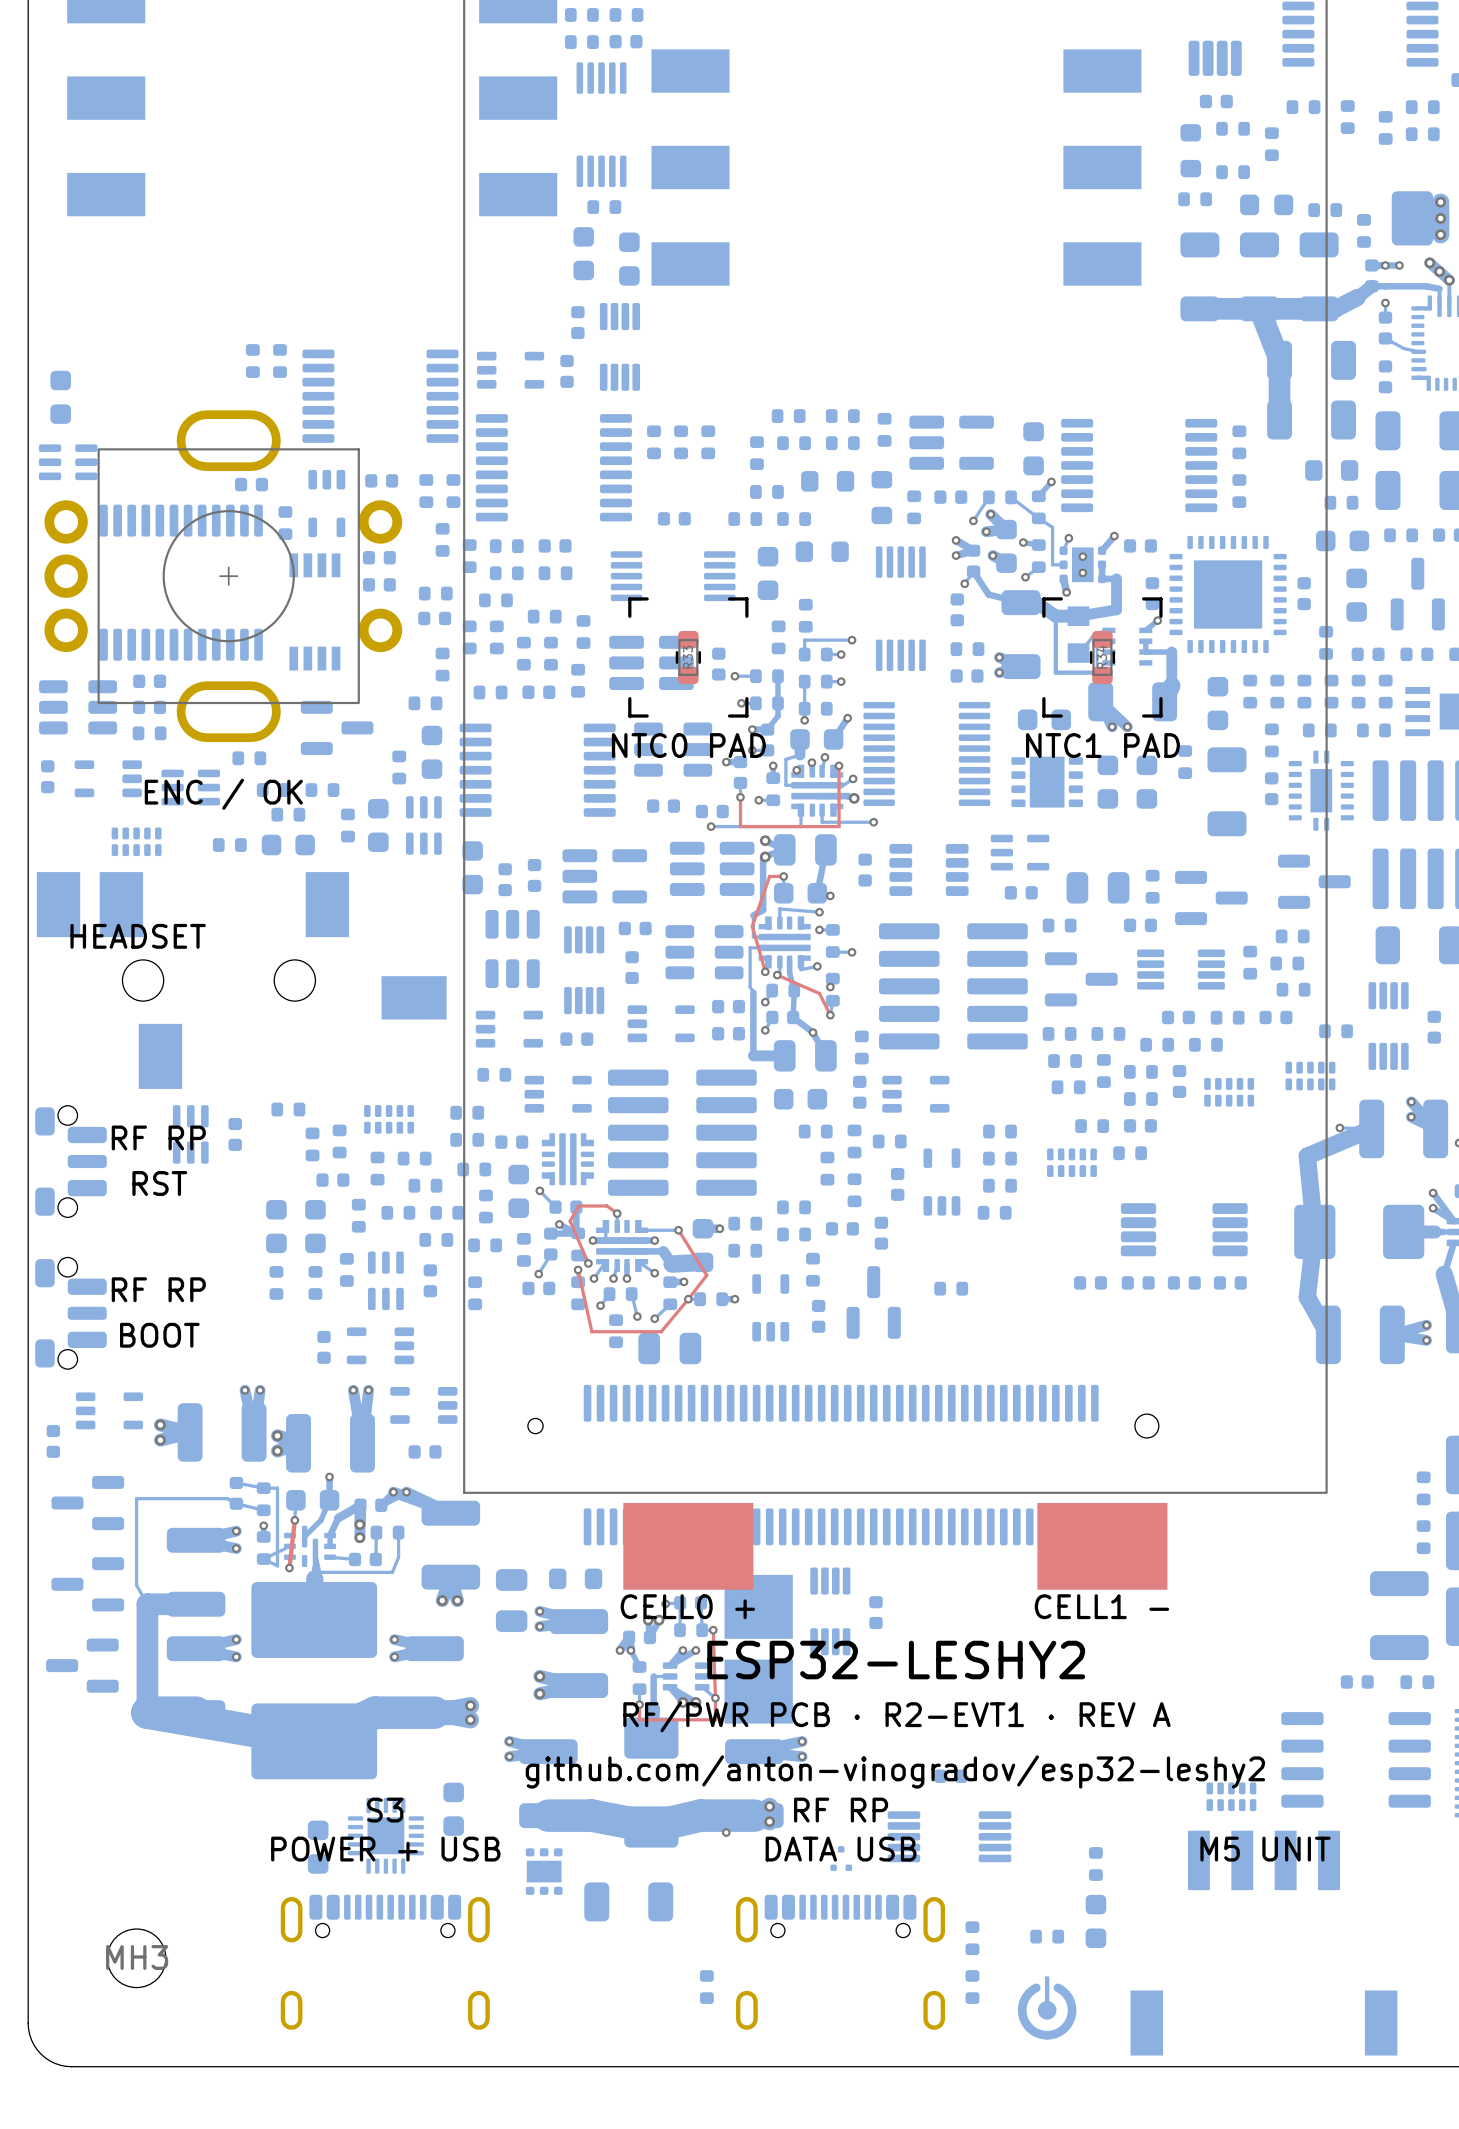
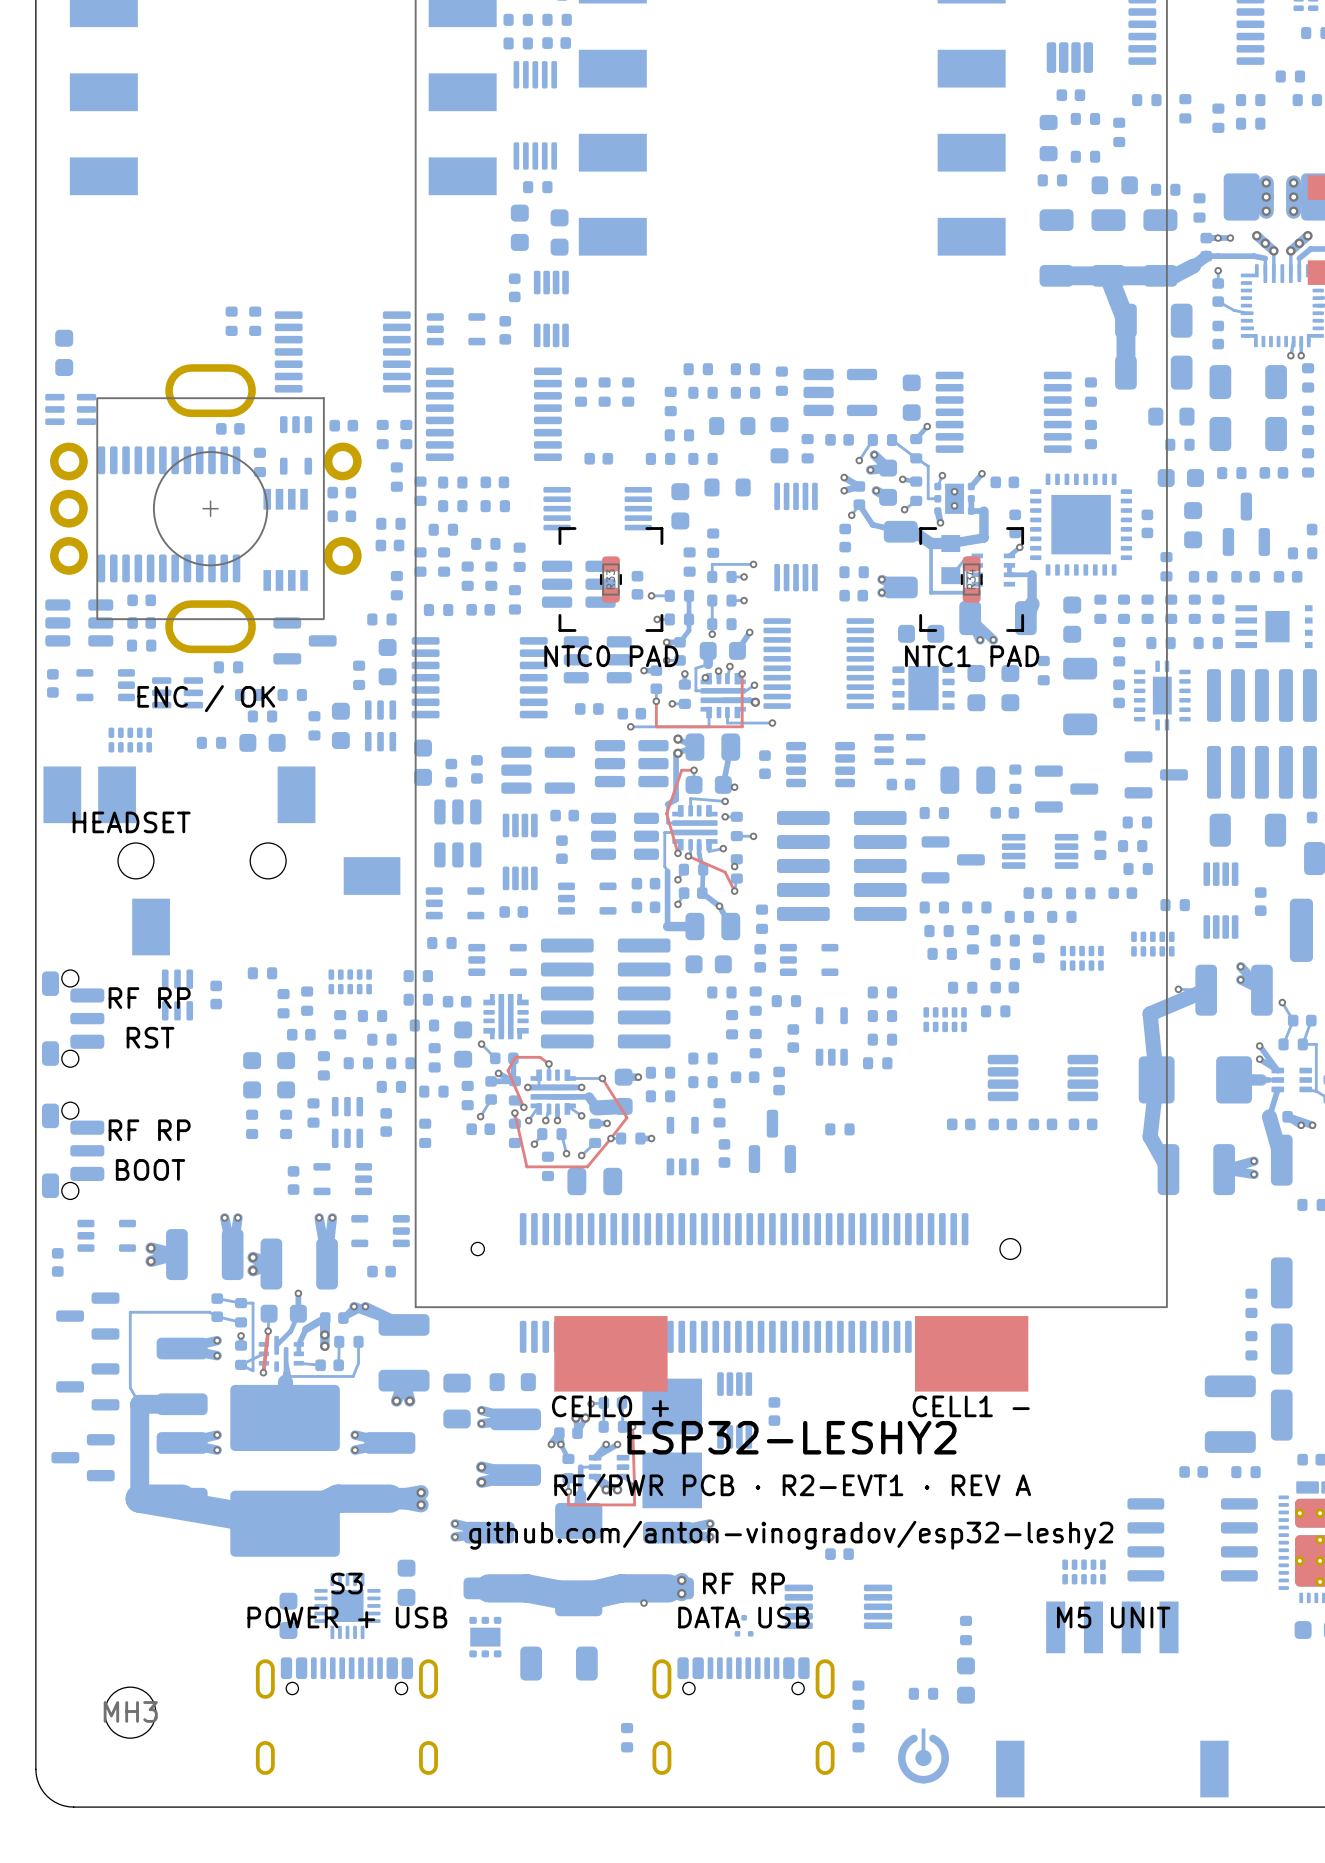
text position: ESP32-LESHY2 (896, 1660) -> ESP32-LESHY2 (791, 1437)
text position: RF/PWR PCB · R2-EVT1 · REV A (896, 1716) -> RF/PWR PCB · R2-EVT1 · REV A (792, 1487)
text position: github.com/anton-vinogradov/esp32-leshy2 (895, 1771) -> github.com/anton-vinogradov/esp32-leshy2 (791, 1535)

